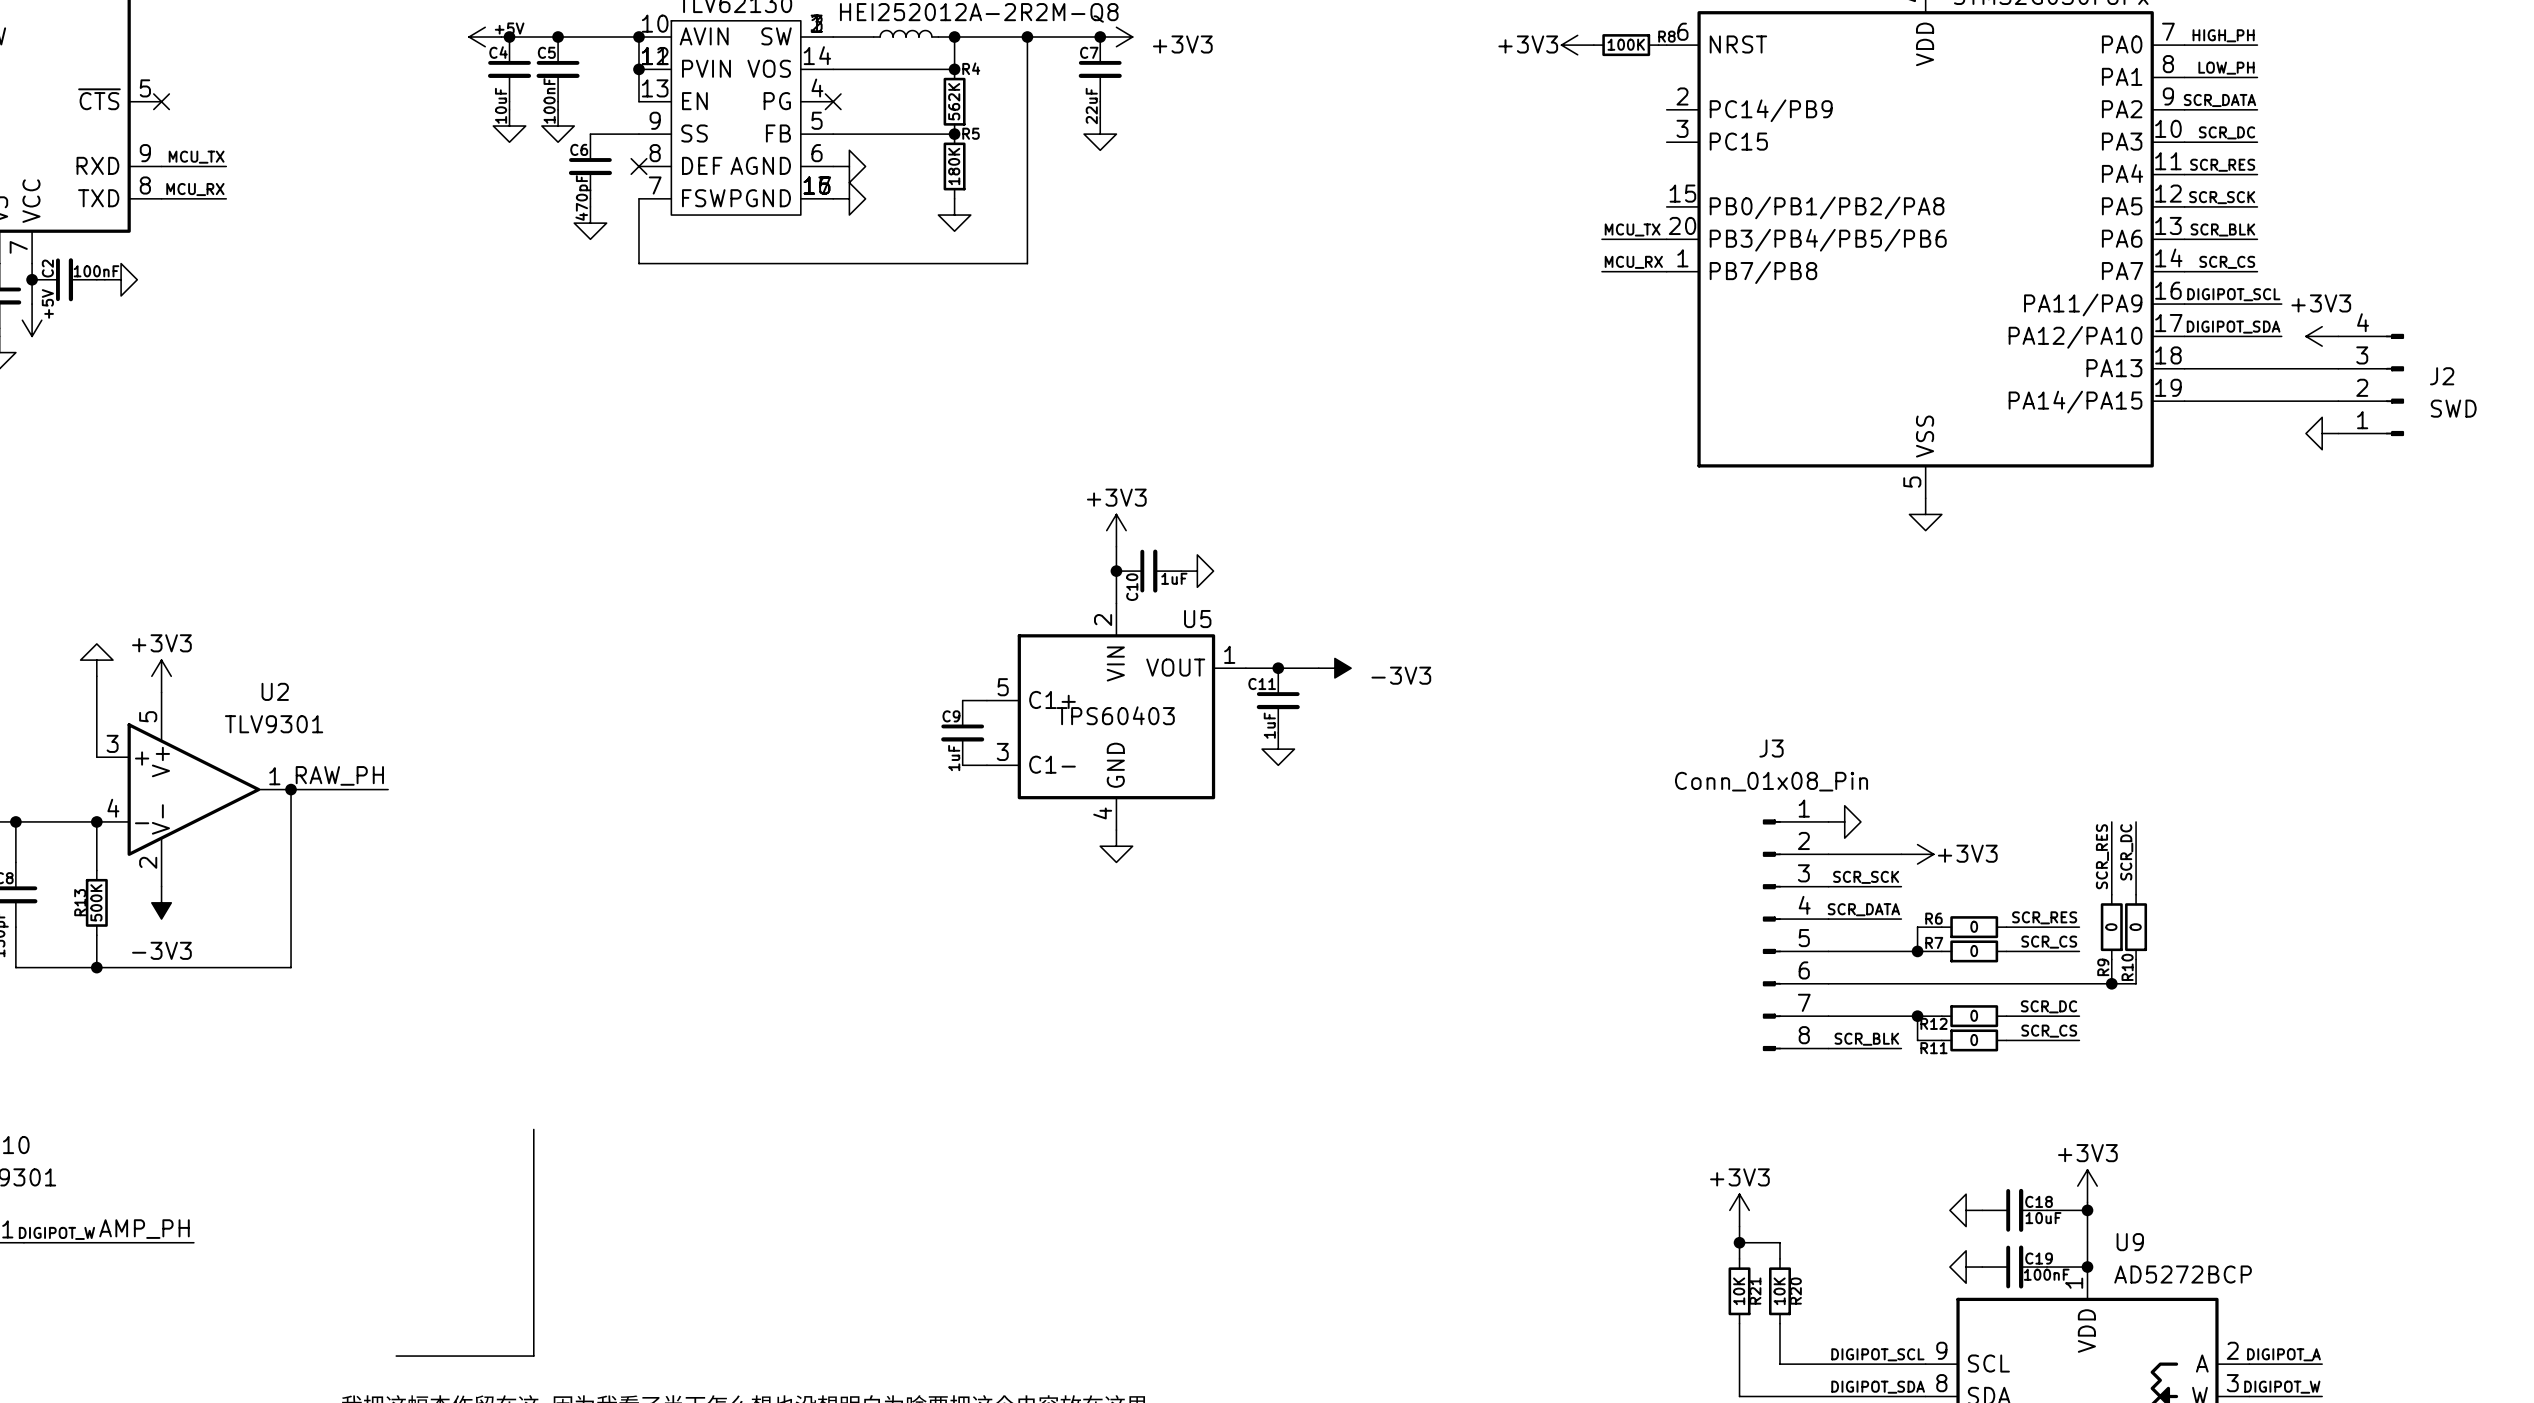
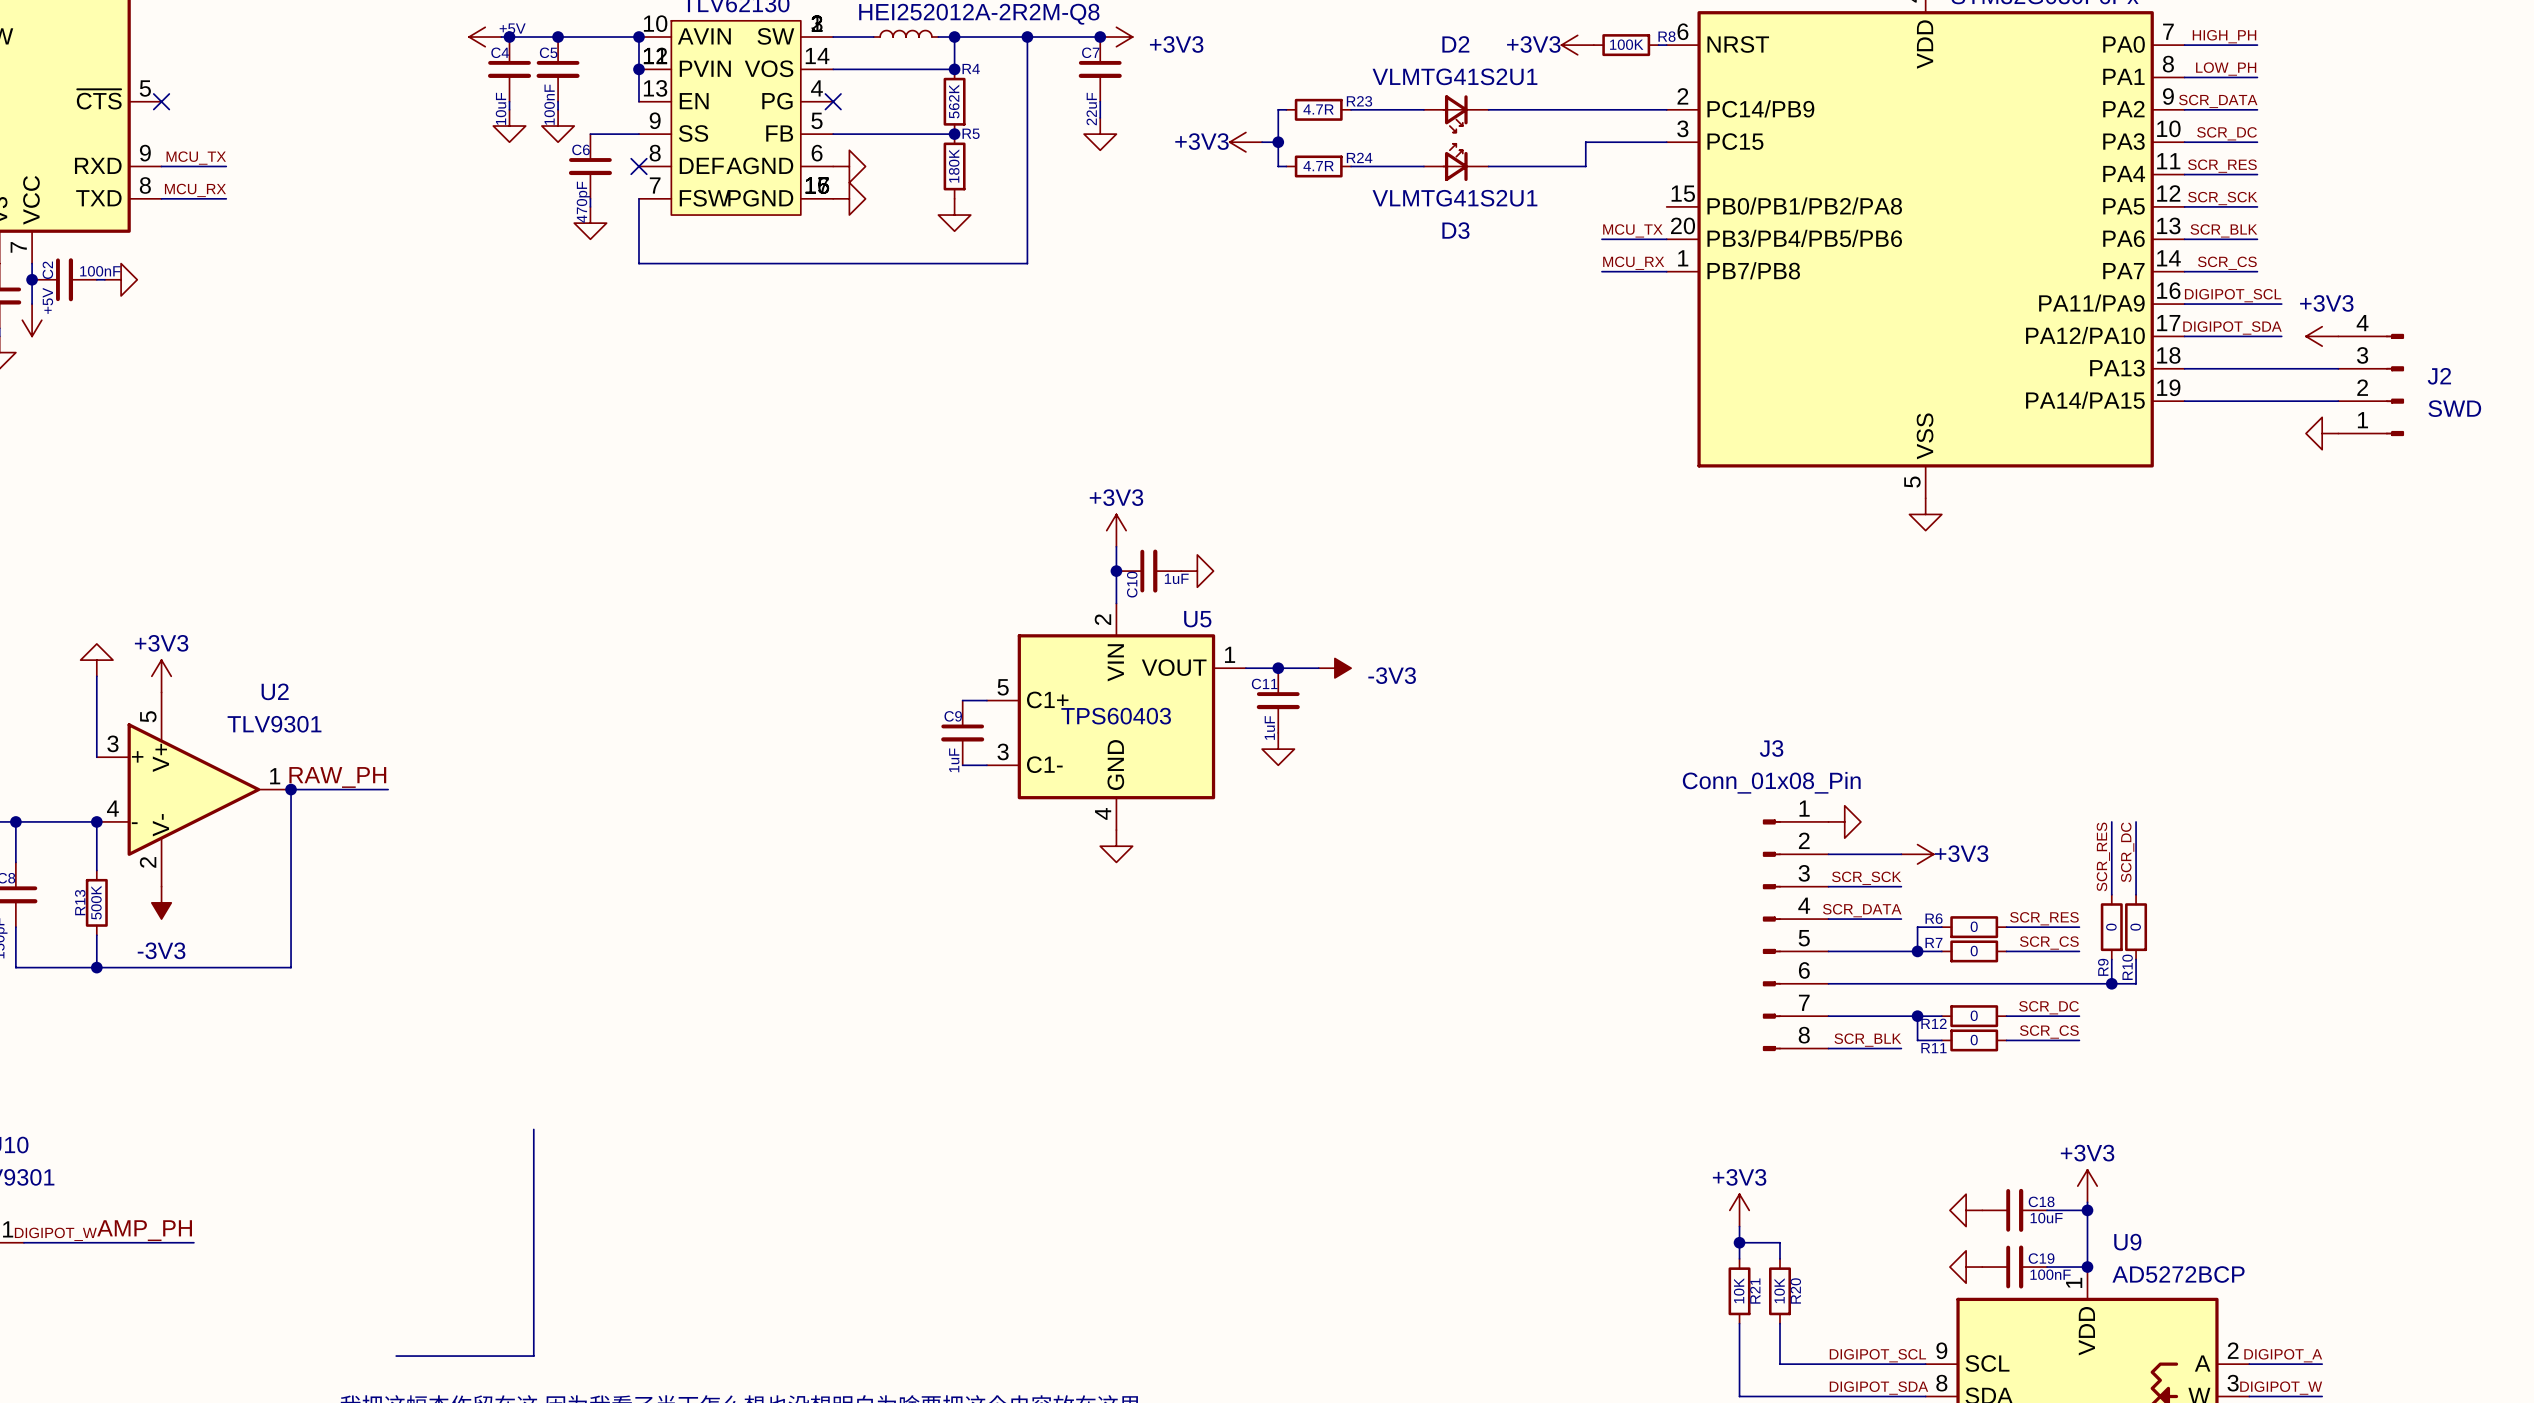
wire: none -> (1286, 109) (1278, 109) (1278, 166) (1286, 166)
R23: none -> 4.7R (1318, 109)
wire: none -> (1351, 109) (1423, 109)
wire: none -> (1488, 109) (1666, 109)
D2: none -> VLMTG41S2U1 (1456, 113)
power symbol: none -> +3V3 (1245, 142)
wire: none -> (1262, 142) (1278, 142)
junction: none -> (1278, 142)
wire: none -> (1666, 142) (1585, 142) (1585, 166) (1488, 166)
D3: none -> VLMTG41S2U1 (1456, 162)
R24: none -> 4.7R (1318, 166)
wire: none -> (1351, 166) (1423, 166)

